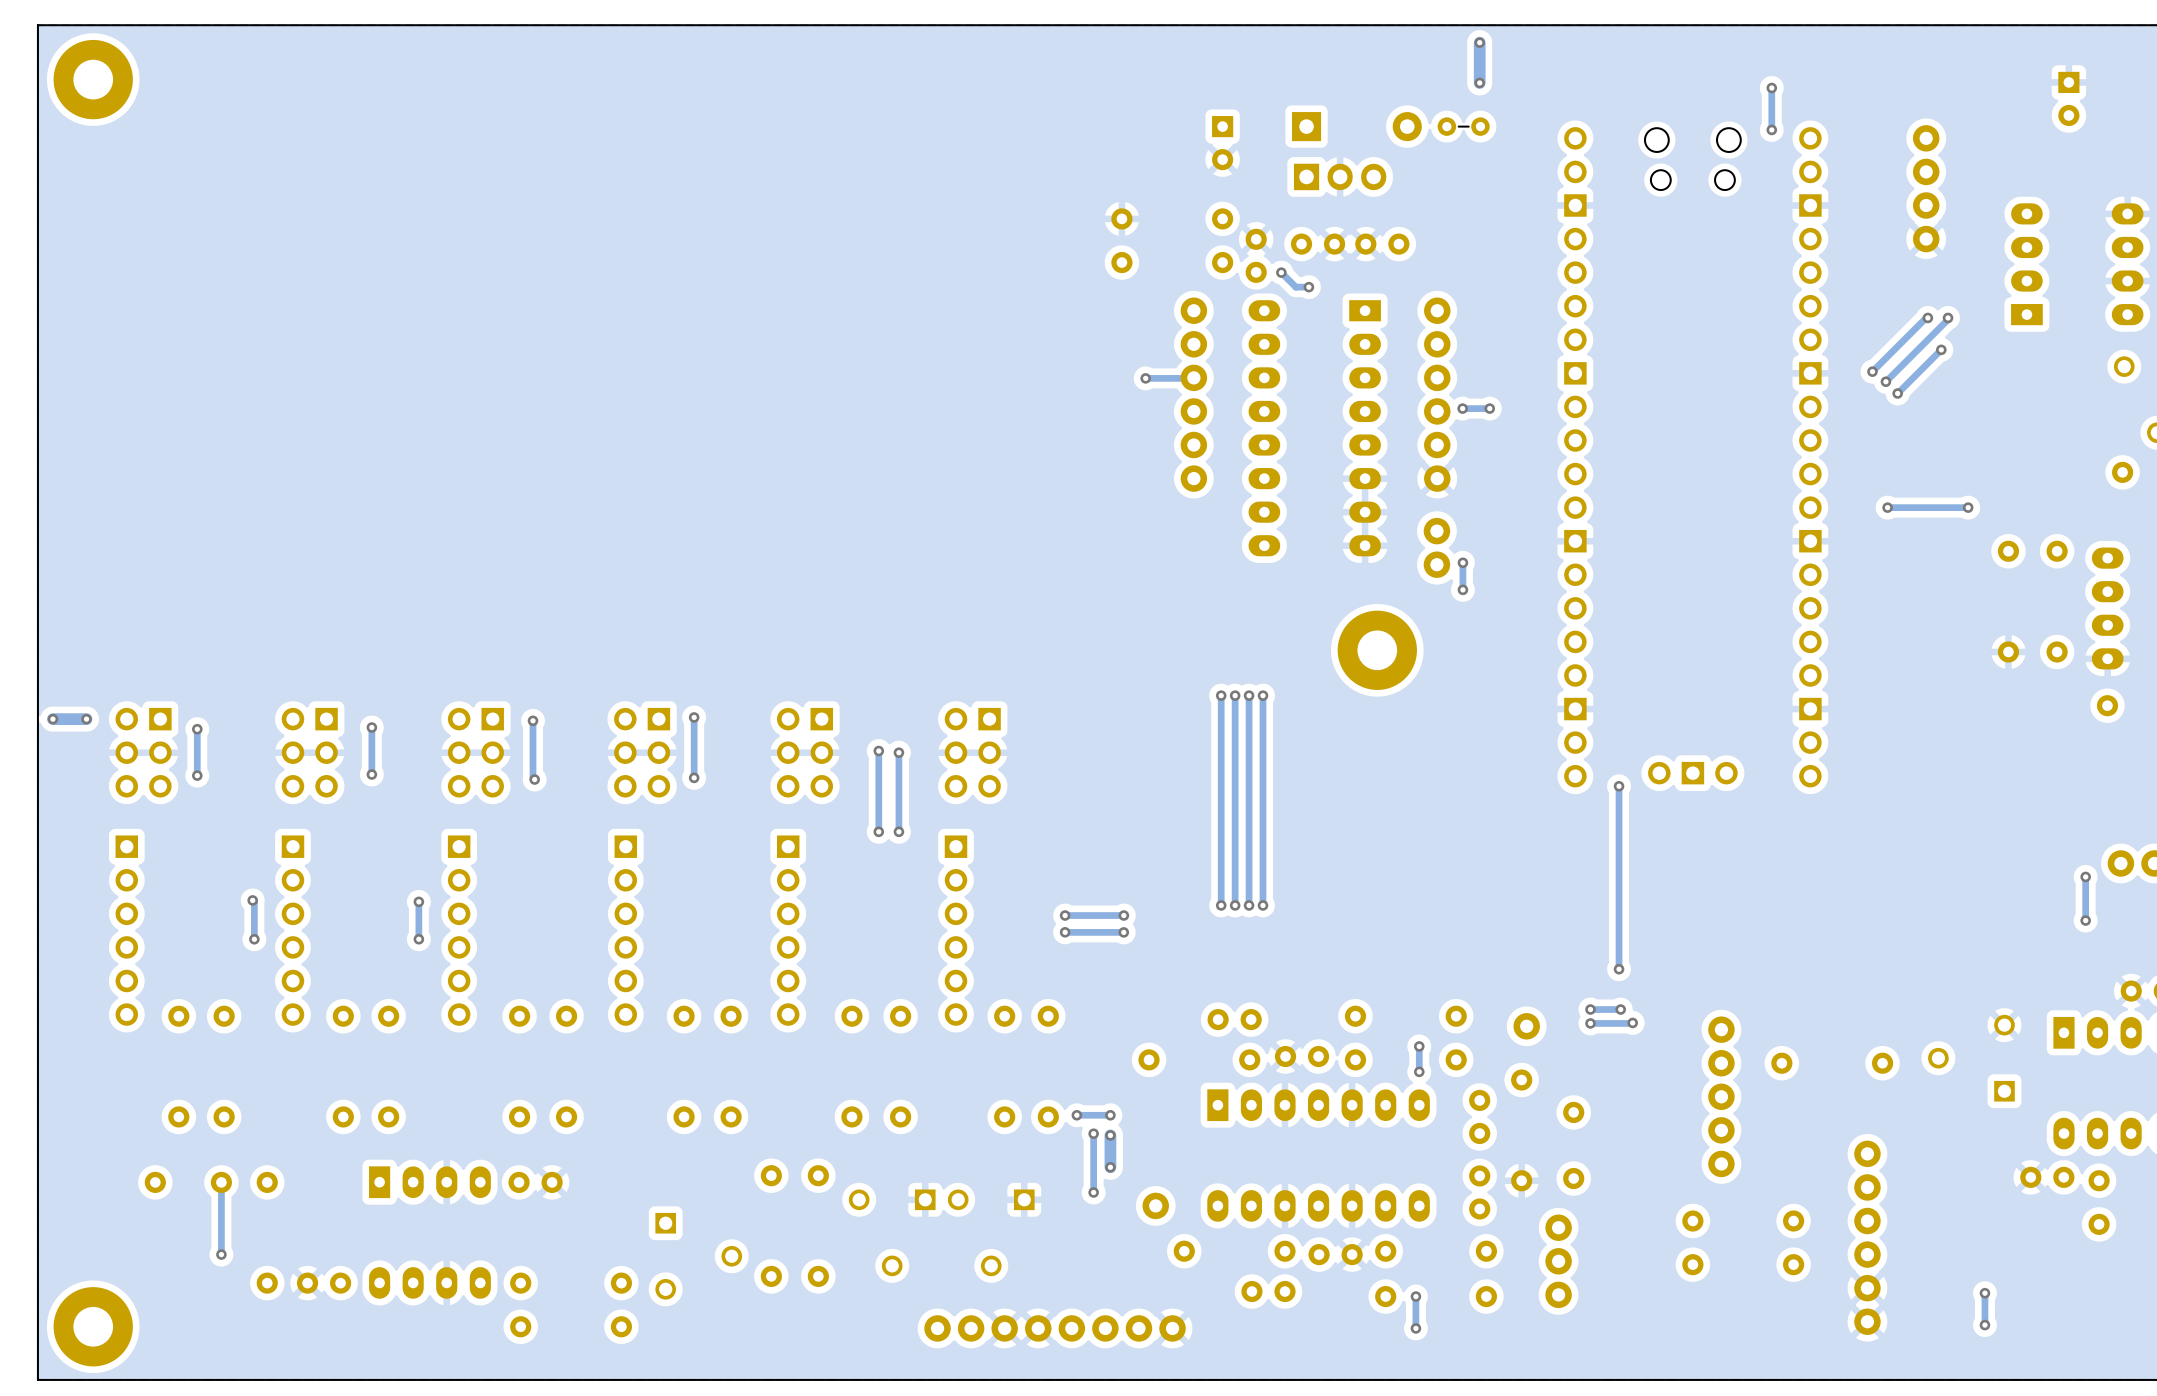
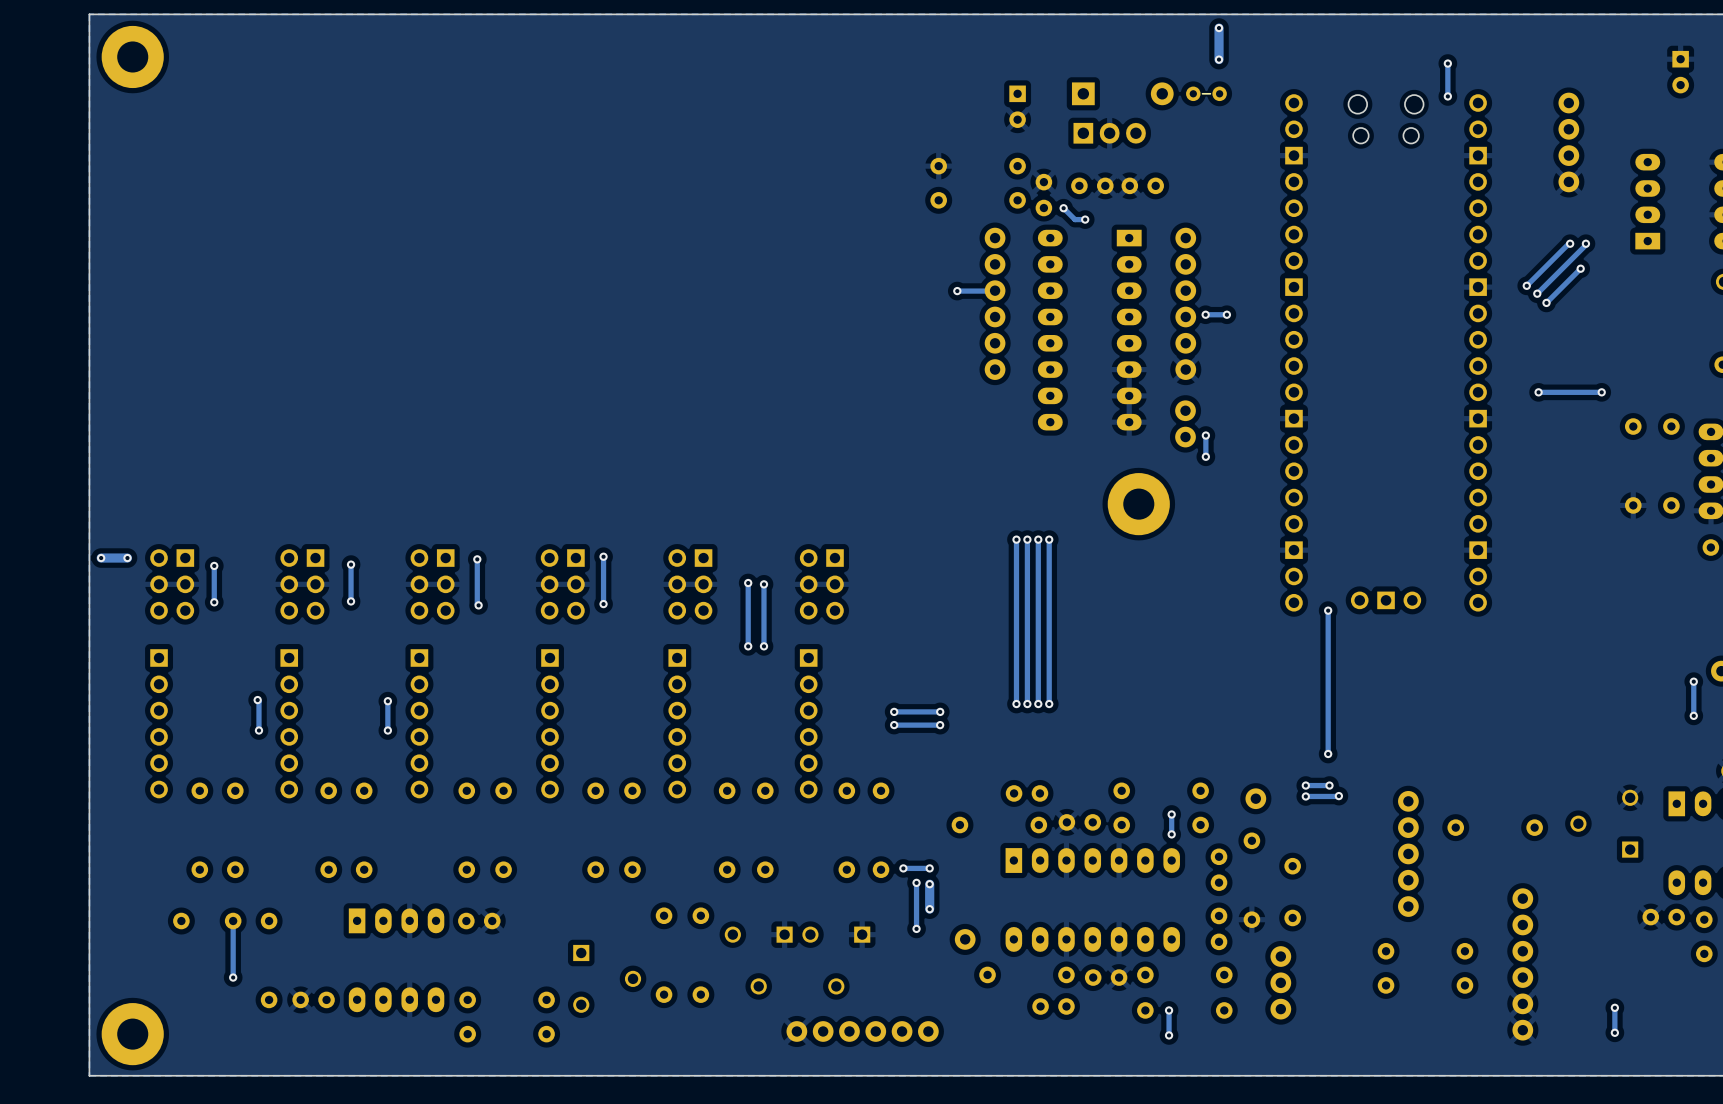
part: none -> (862, 1031)
part: (1055, 1328) -> none

